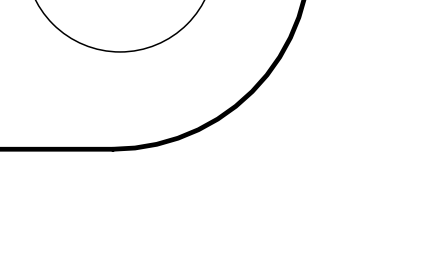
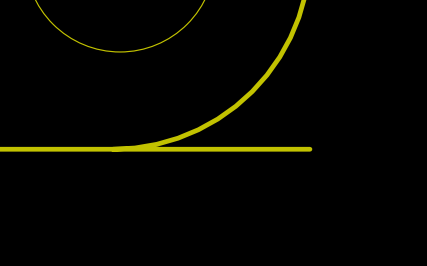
board edge: none -> (113, 149) (309, 149)

